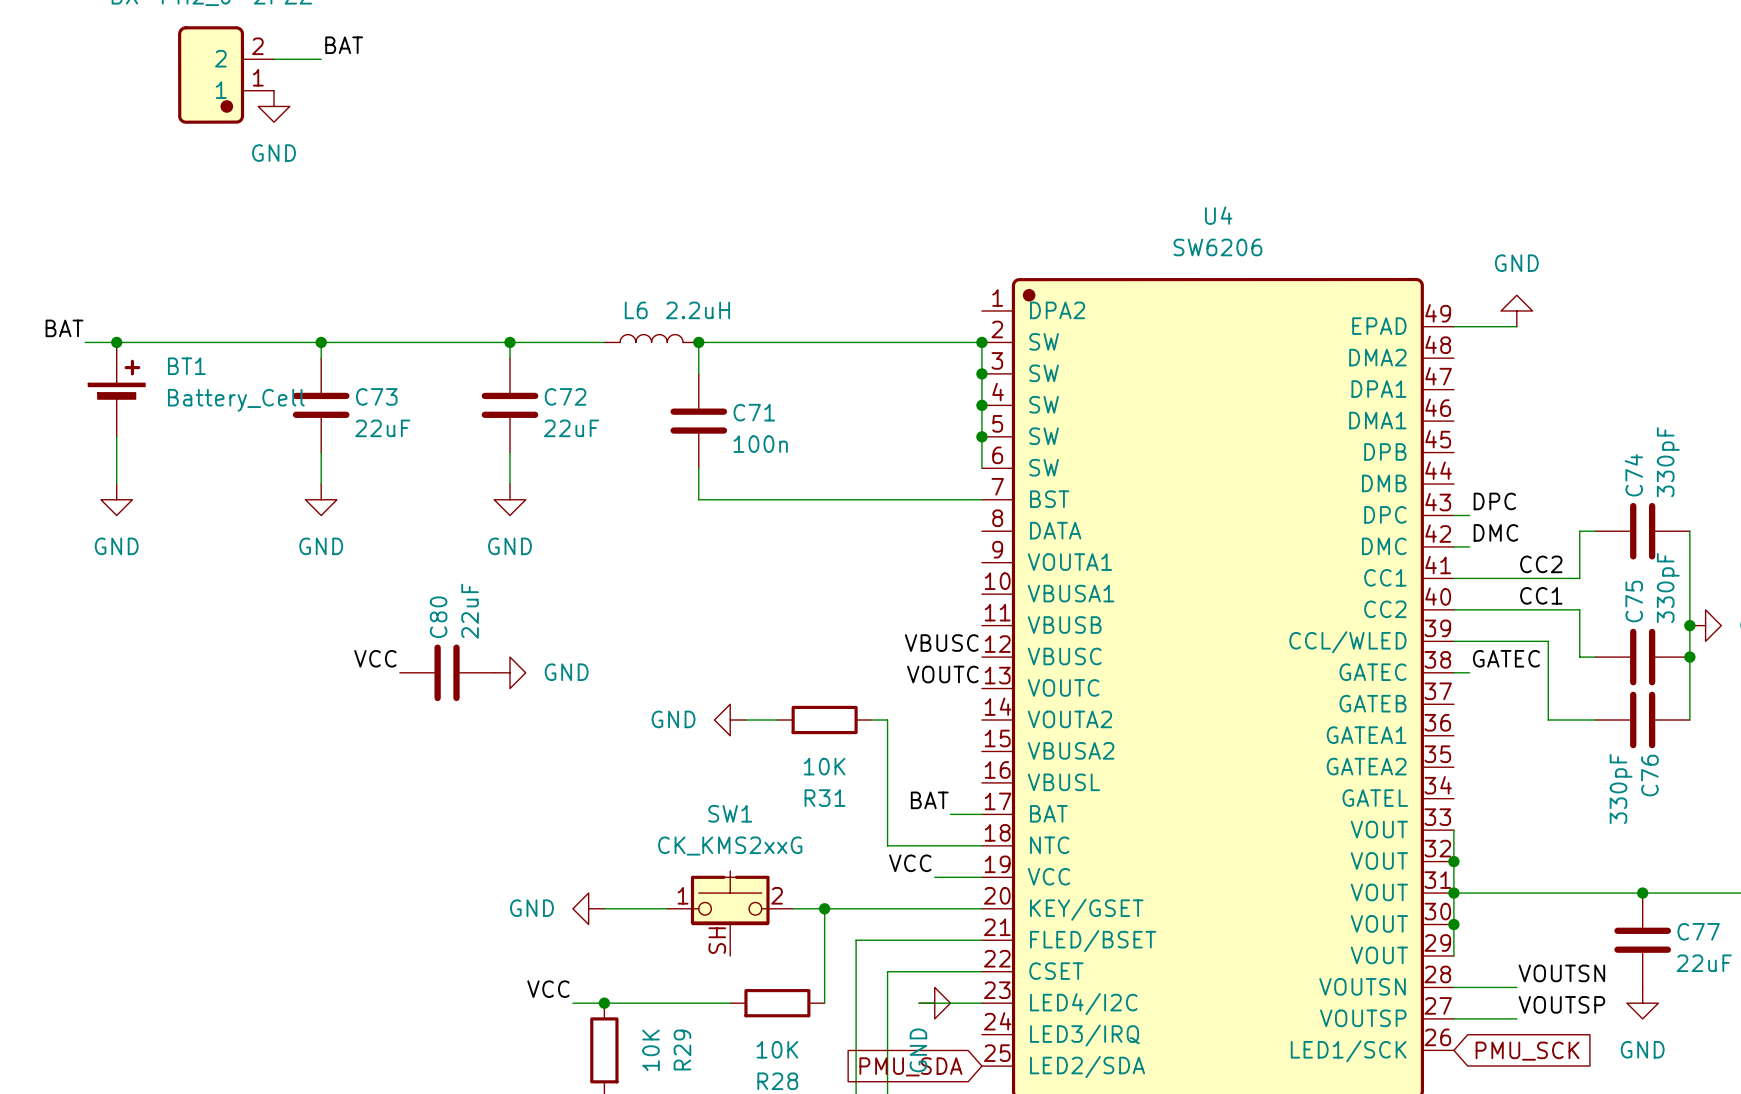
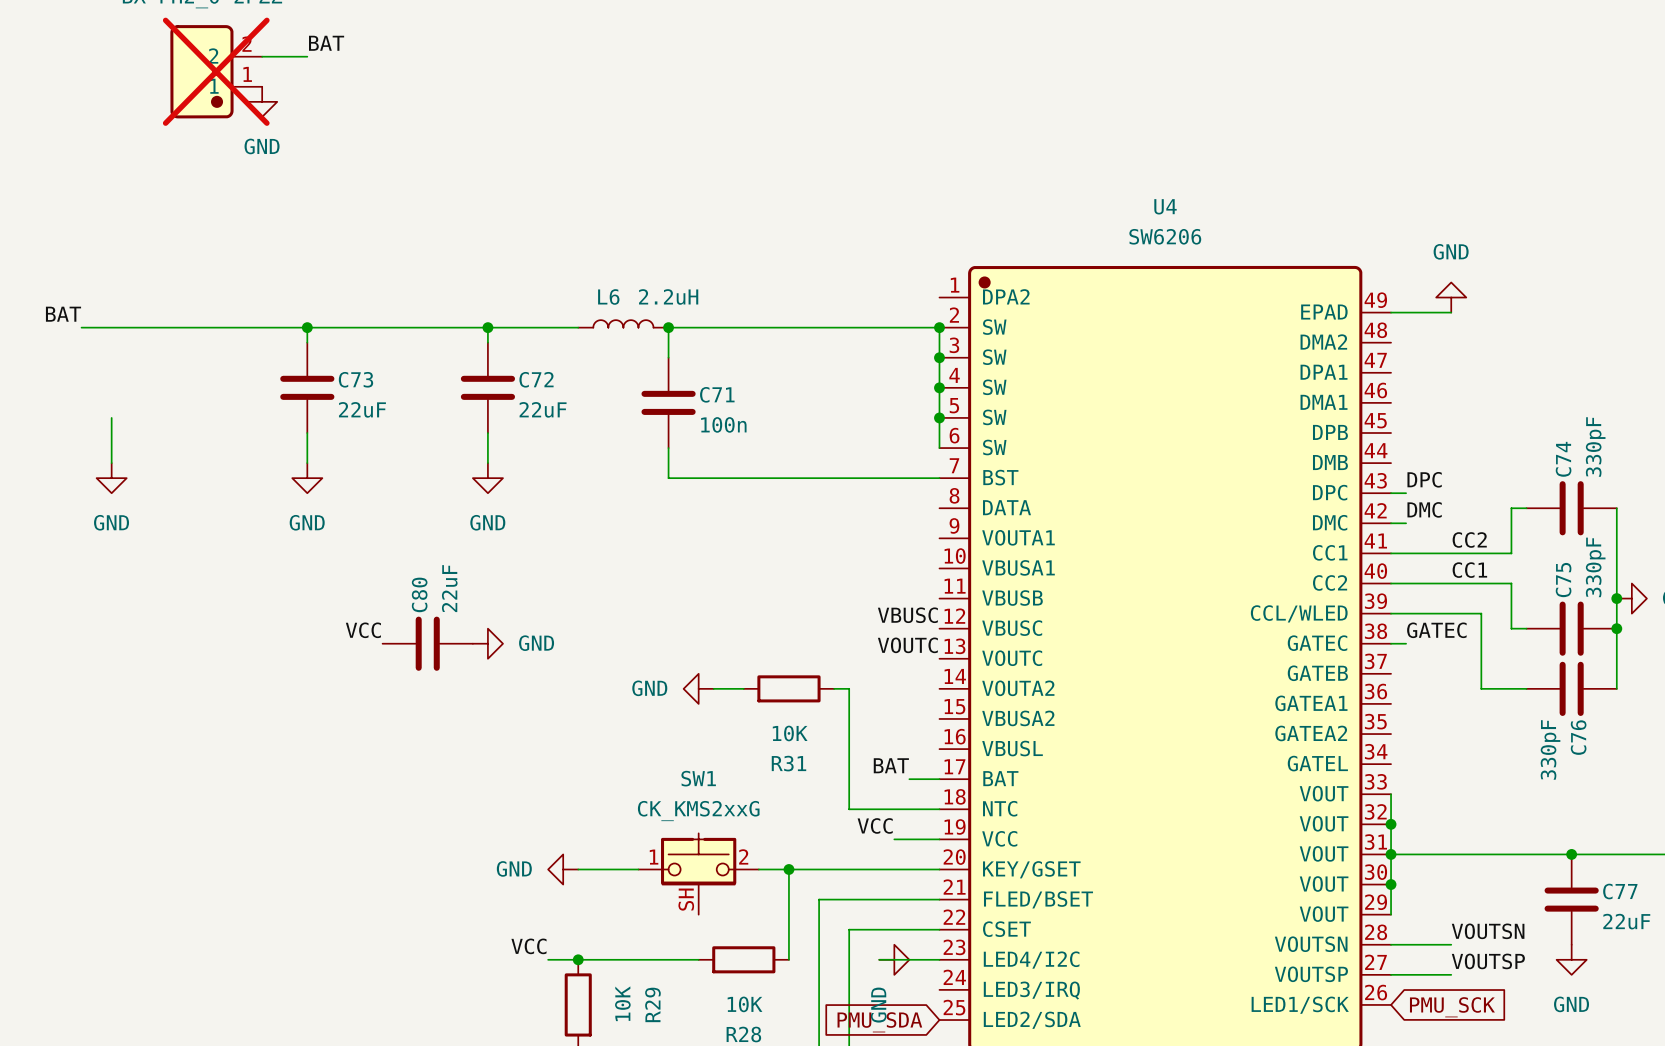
part do-not-place cross: none -> (216, 71)
junction: (116, 342) -> none
BT1: Battery_Cell (116, 389) -> none

